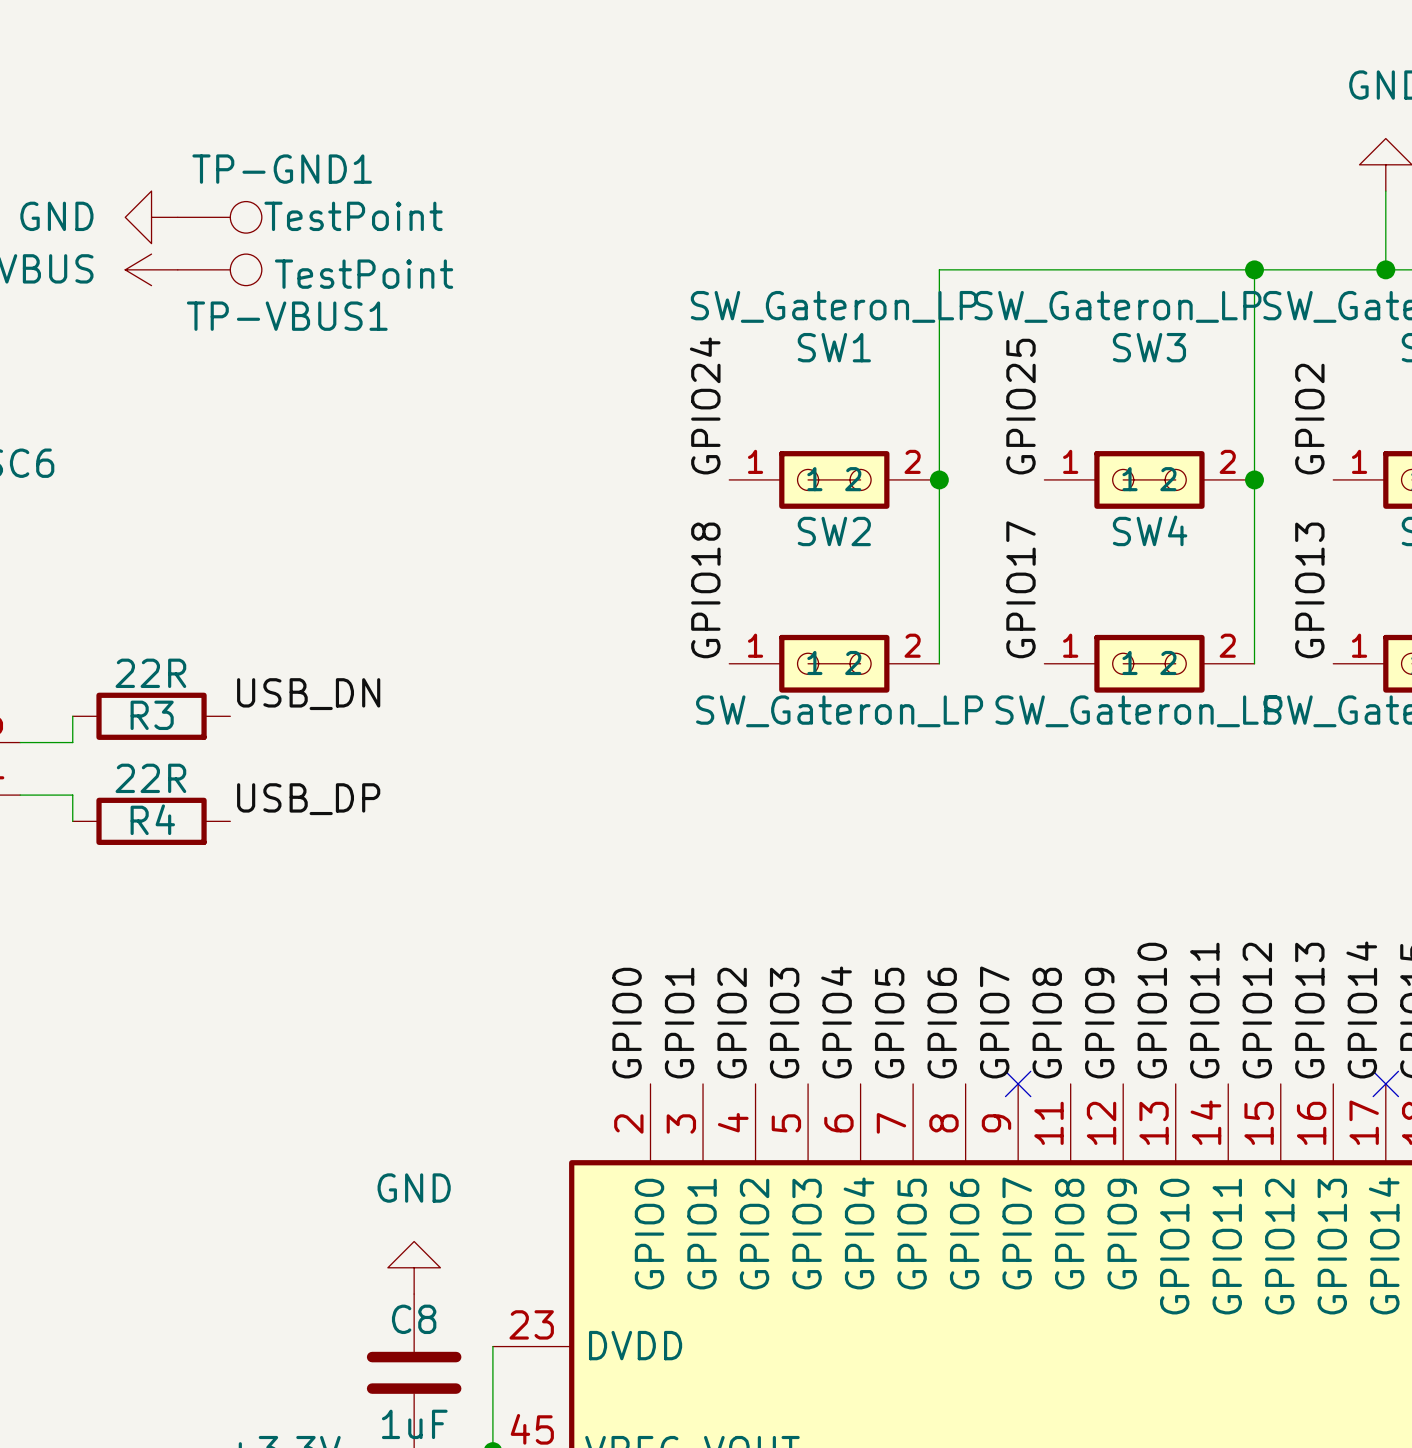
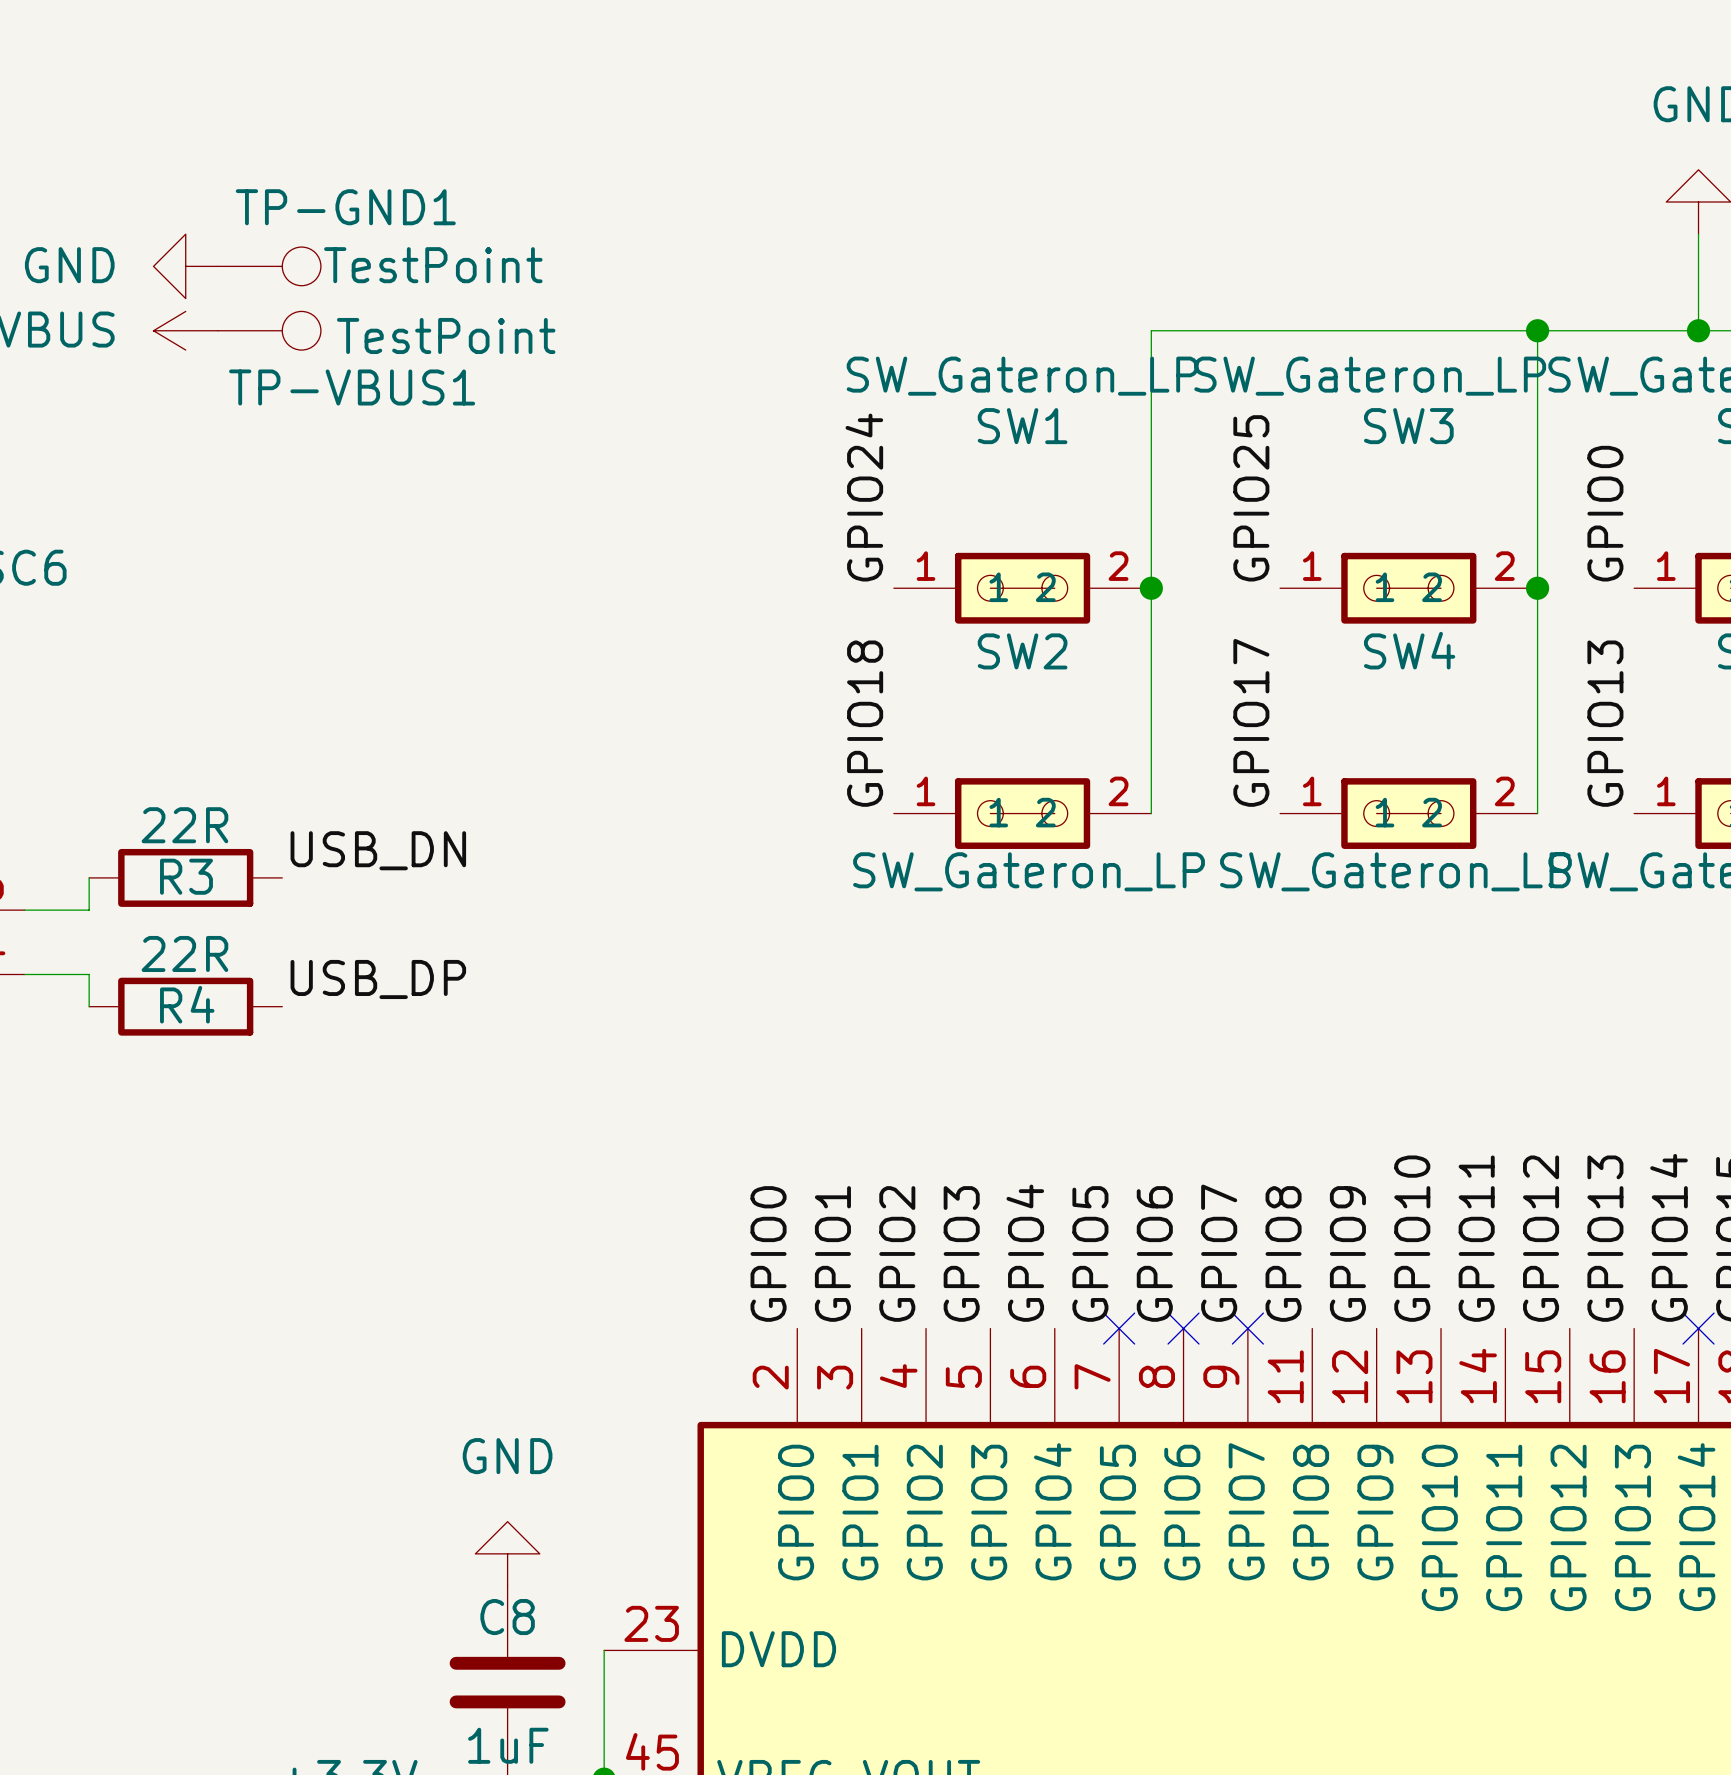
label: GPIO2 (1309, 419) -> GPIO0 (1605, 513)
no-connect mark: none -> (1119, 1328)
no-connect mark: none -> (1183, 1328)

